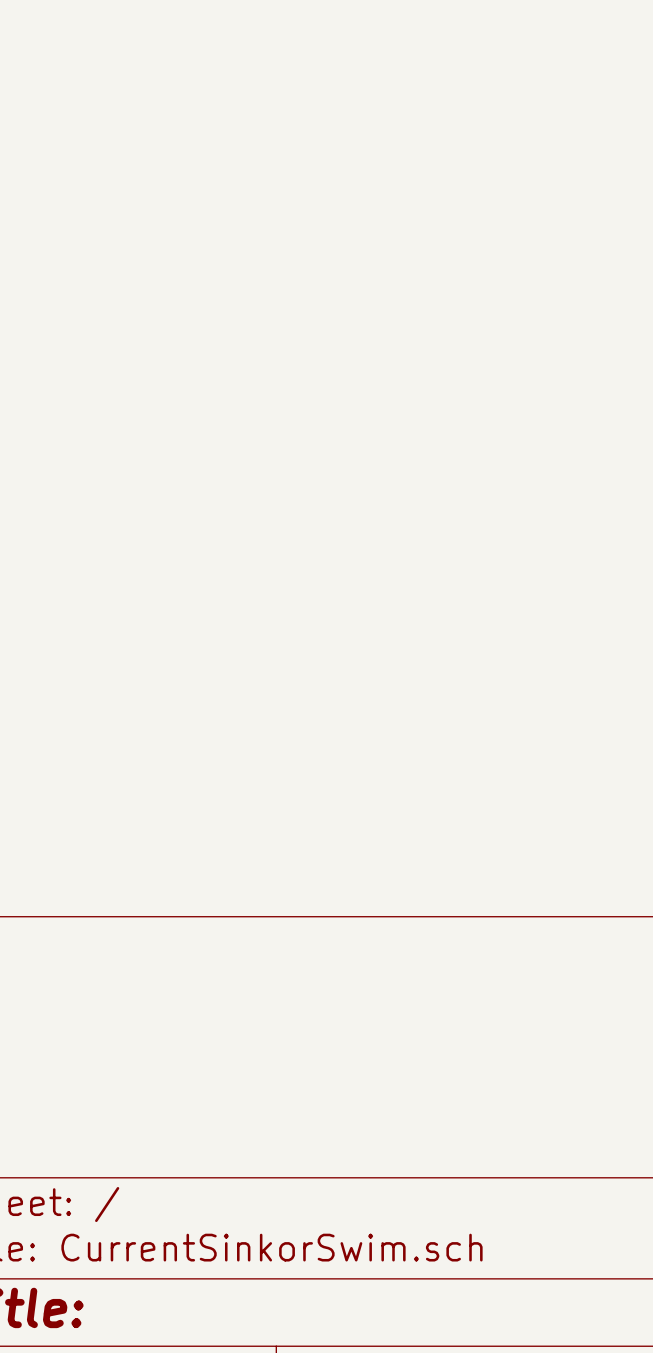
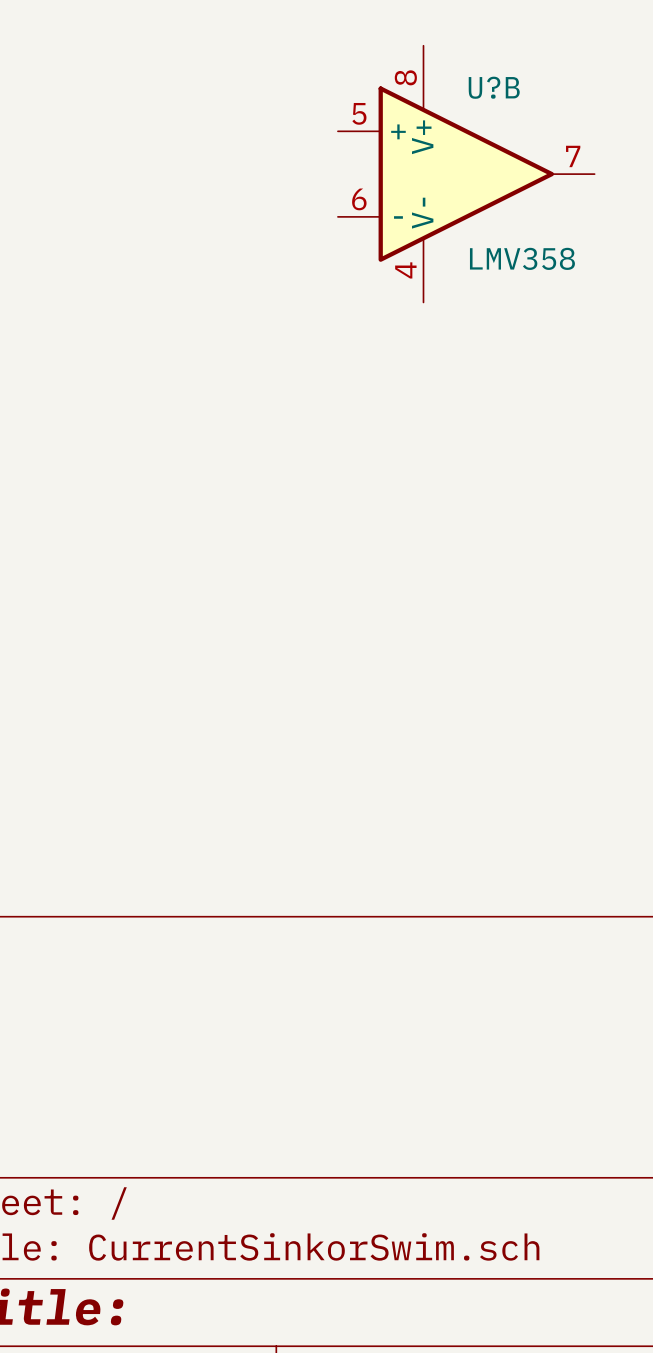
U?B: none -> LMV358 (466, 174)

